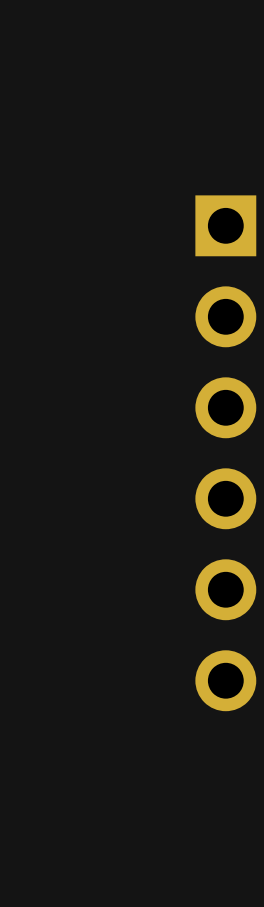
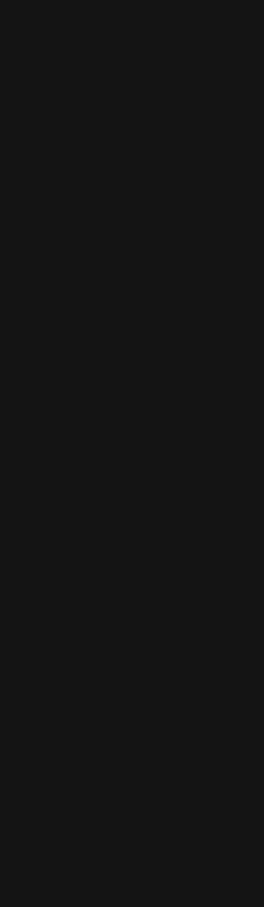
part: (225, 453) -> none

